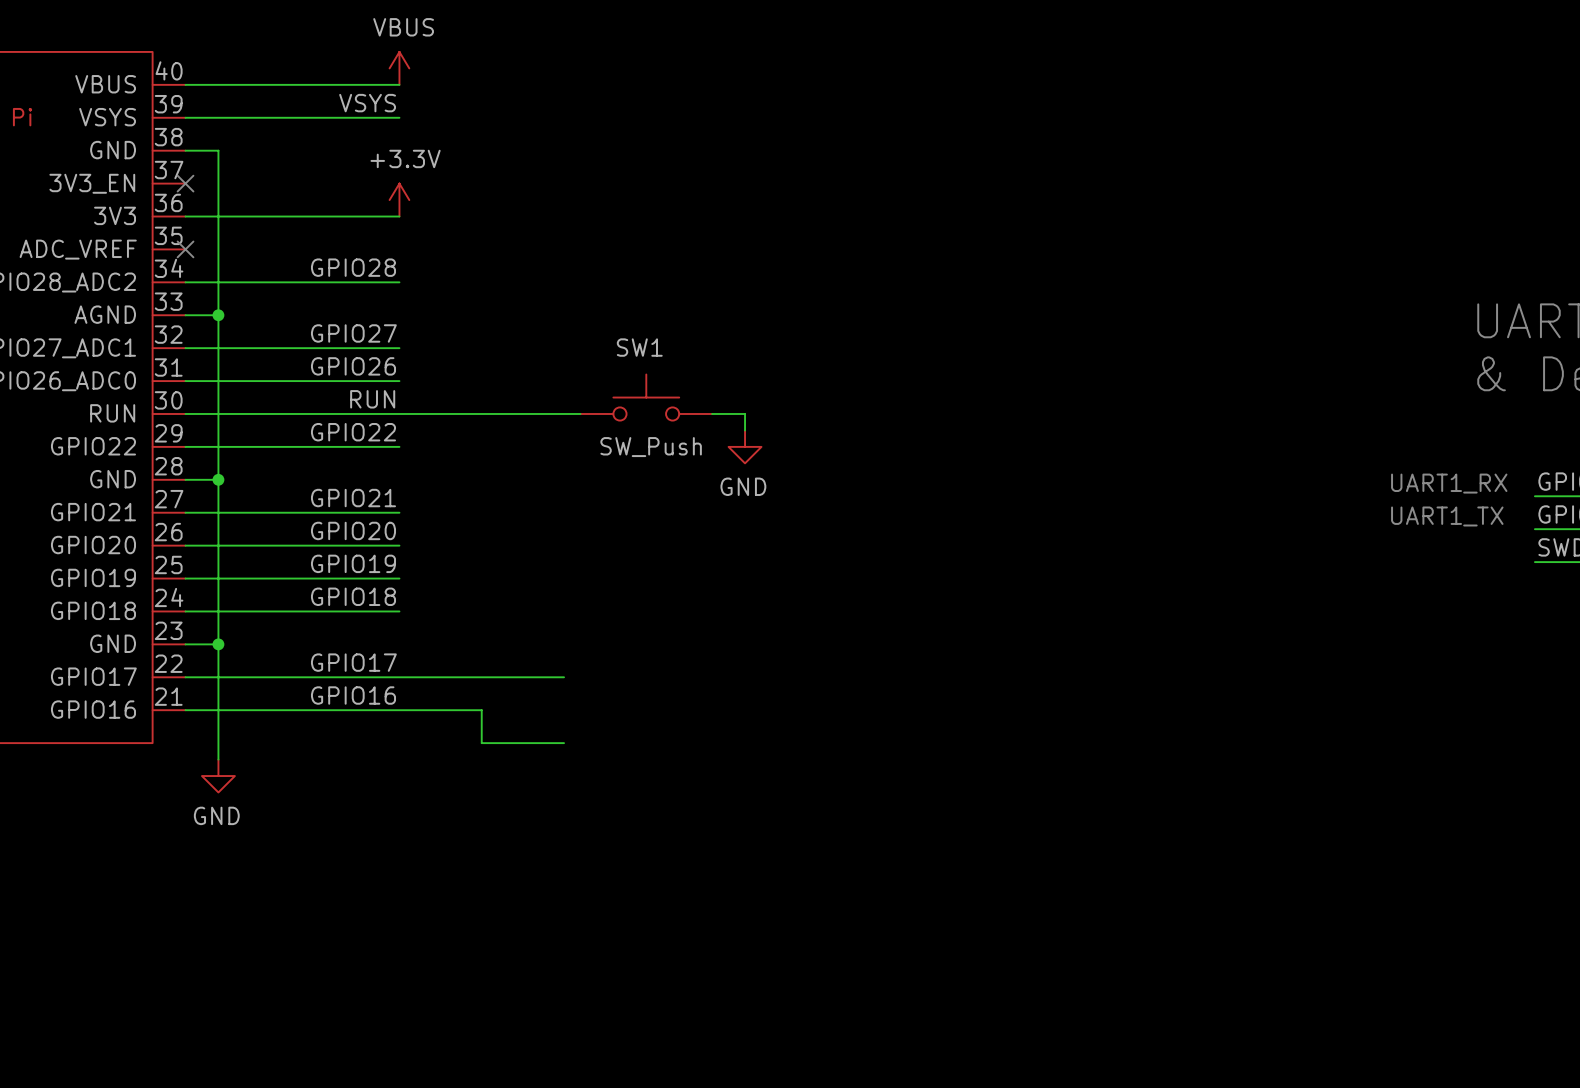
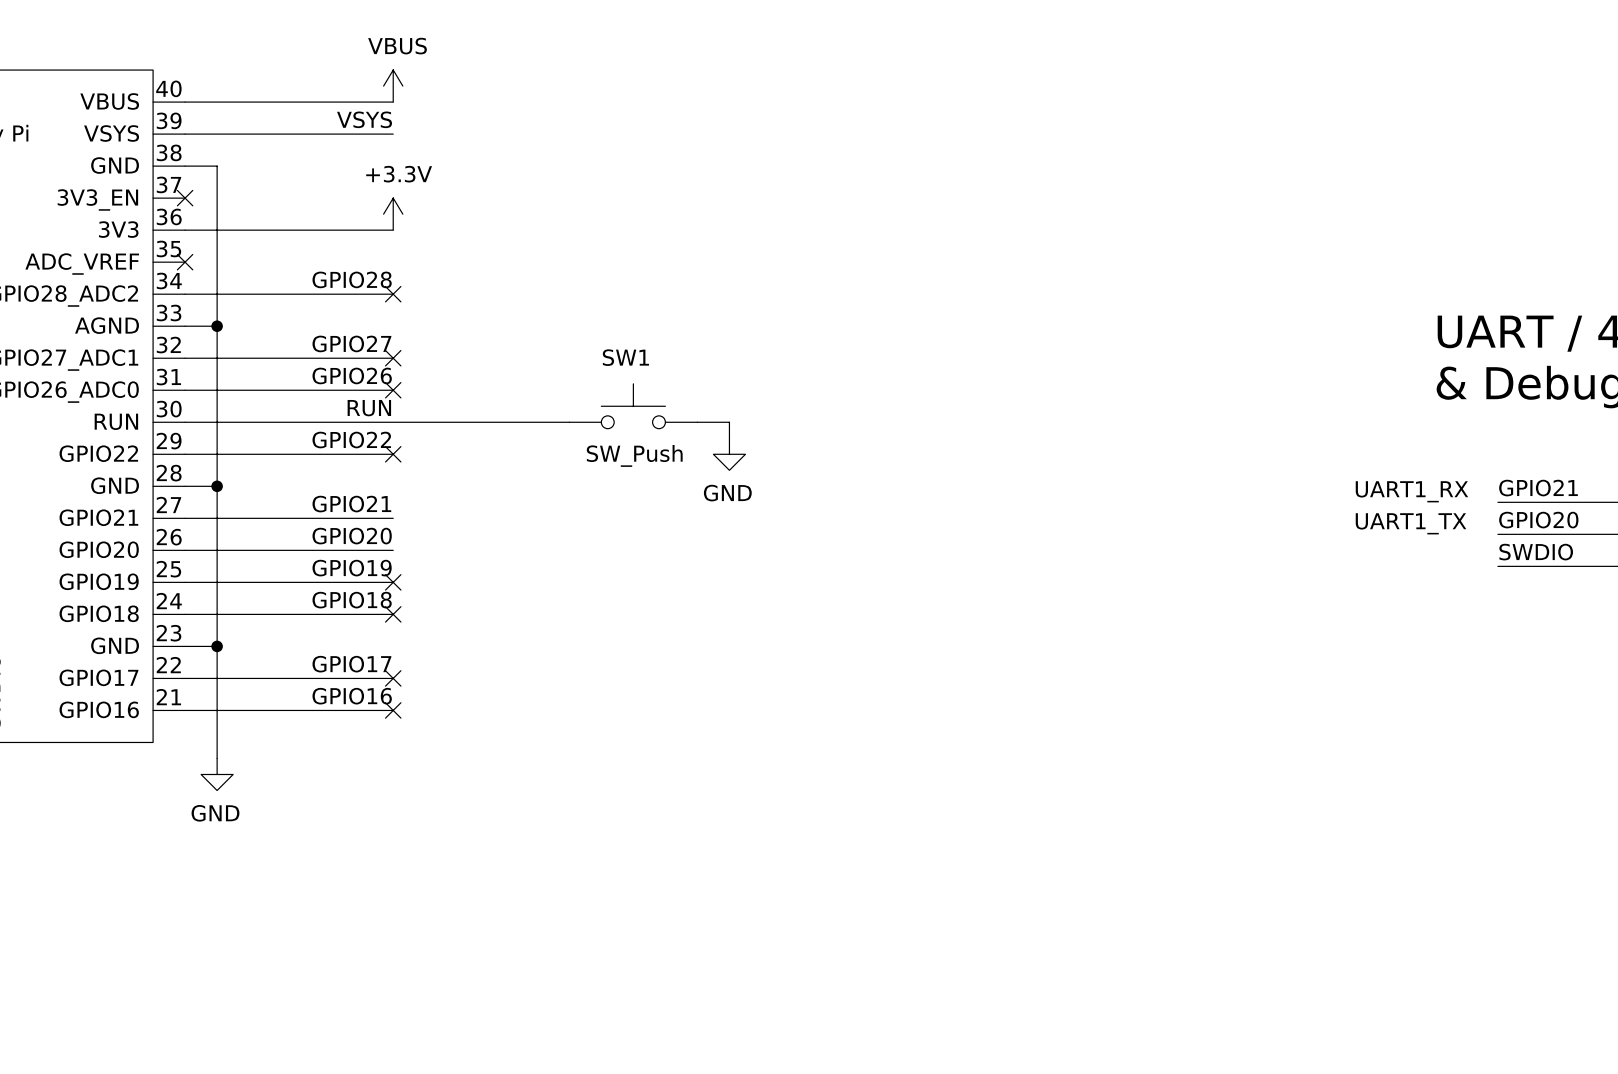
no-connect mark: none -> (393, 294)
no-connect mark: none -> (393, 358)
no-connect mark: none -> (393, 390)
no-connect mark: none -> (393, 454)
no-connect mark: none -> (393, 582)
no-connect mark: none -> (393, 614)
wire: (399, 677) (564, 677) -> none
no-connect mark: none -> (393, 678)
wire: (399, 710) (481, 710) (481, 743) (564, 743) -> none
no-connect mark: none -> (393, 710)

